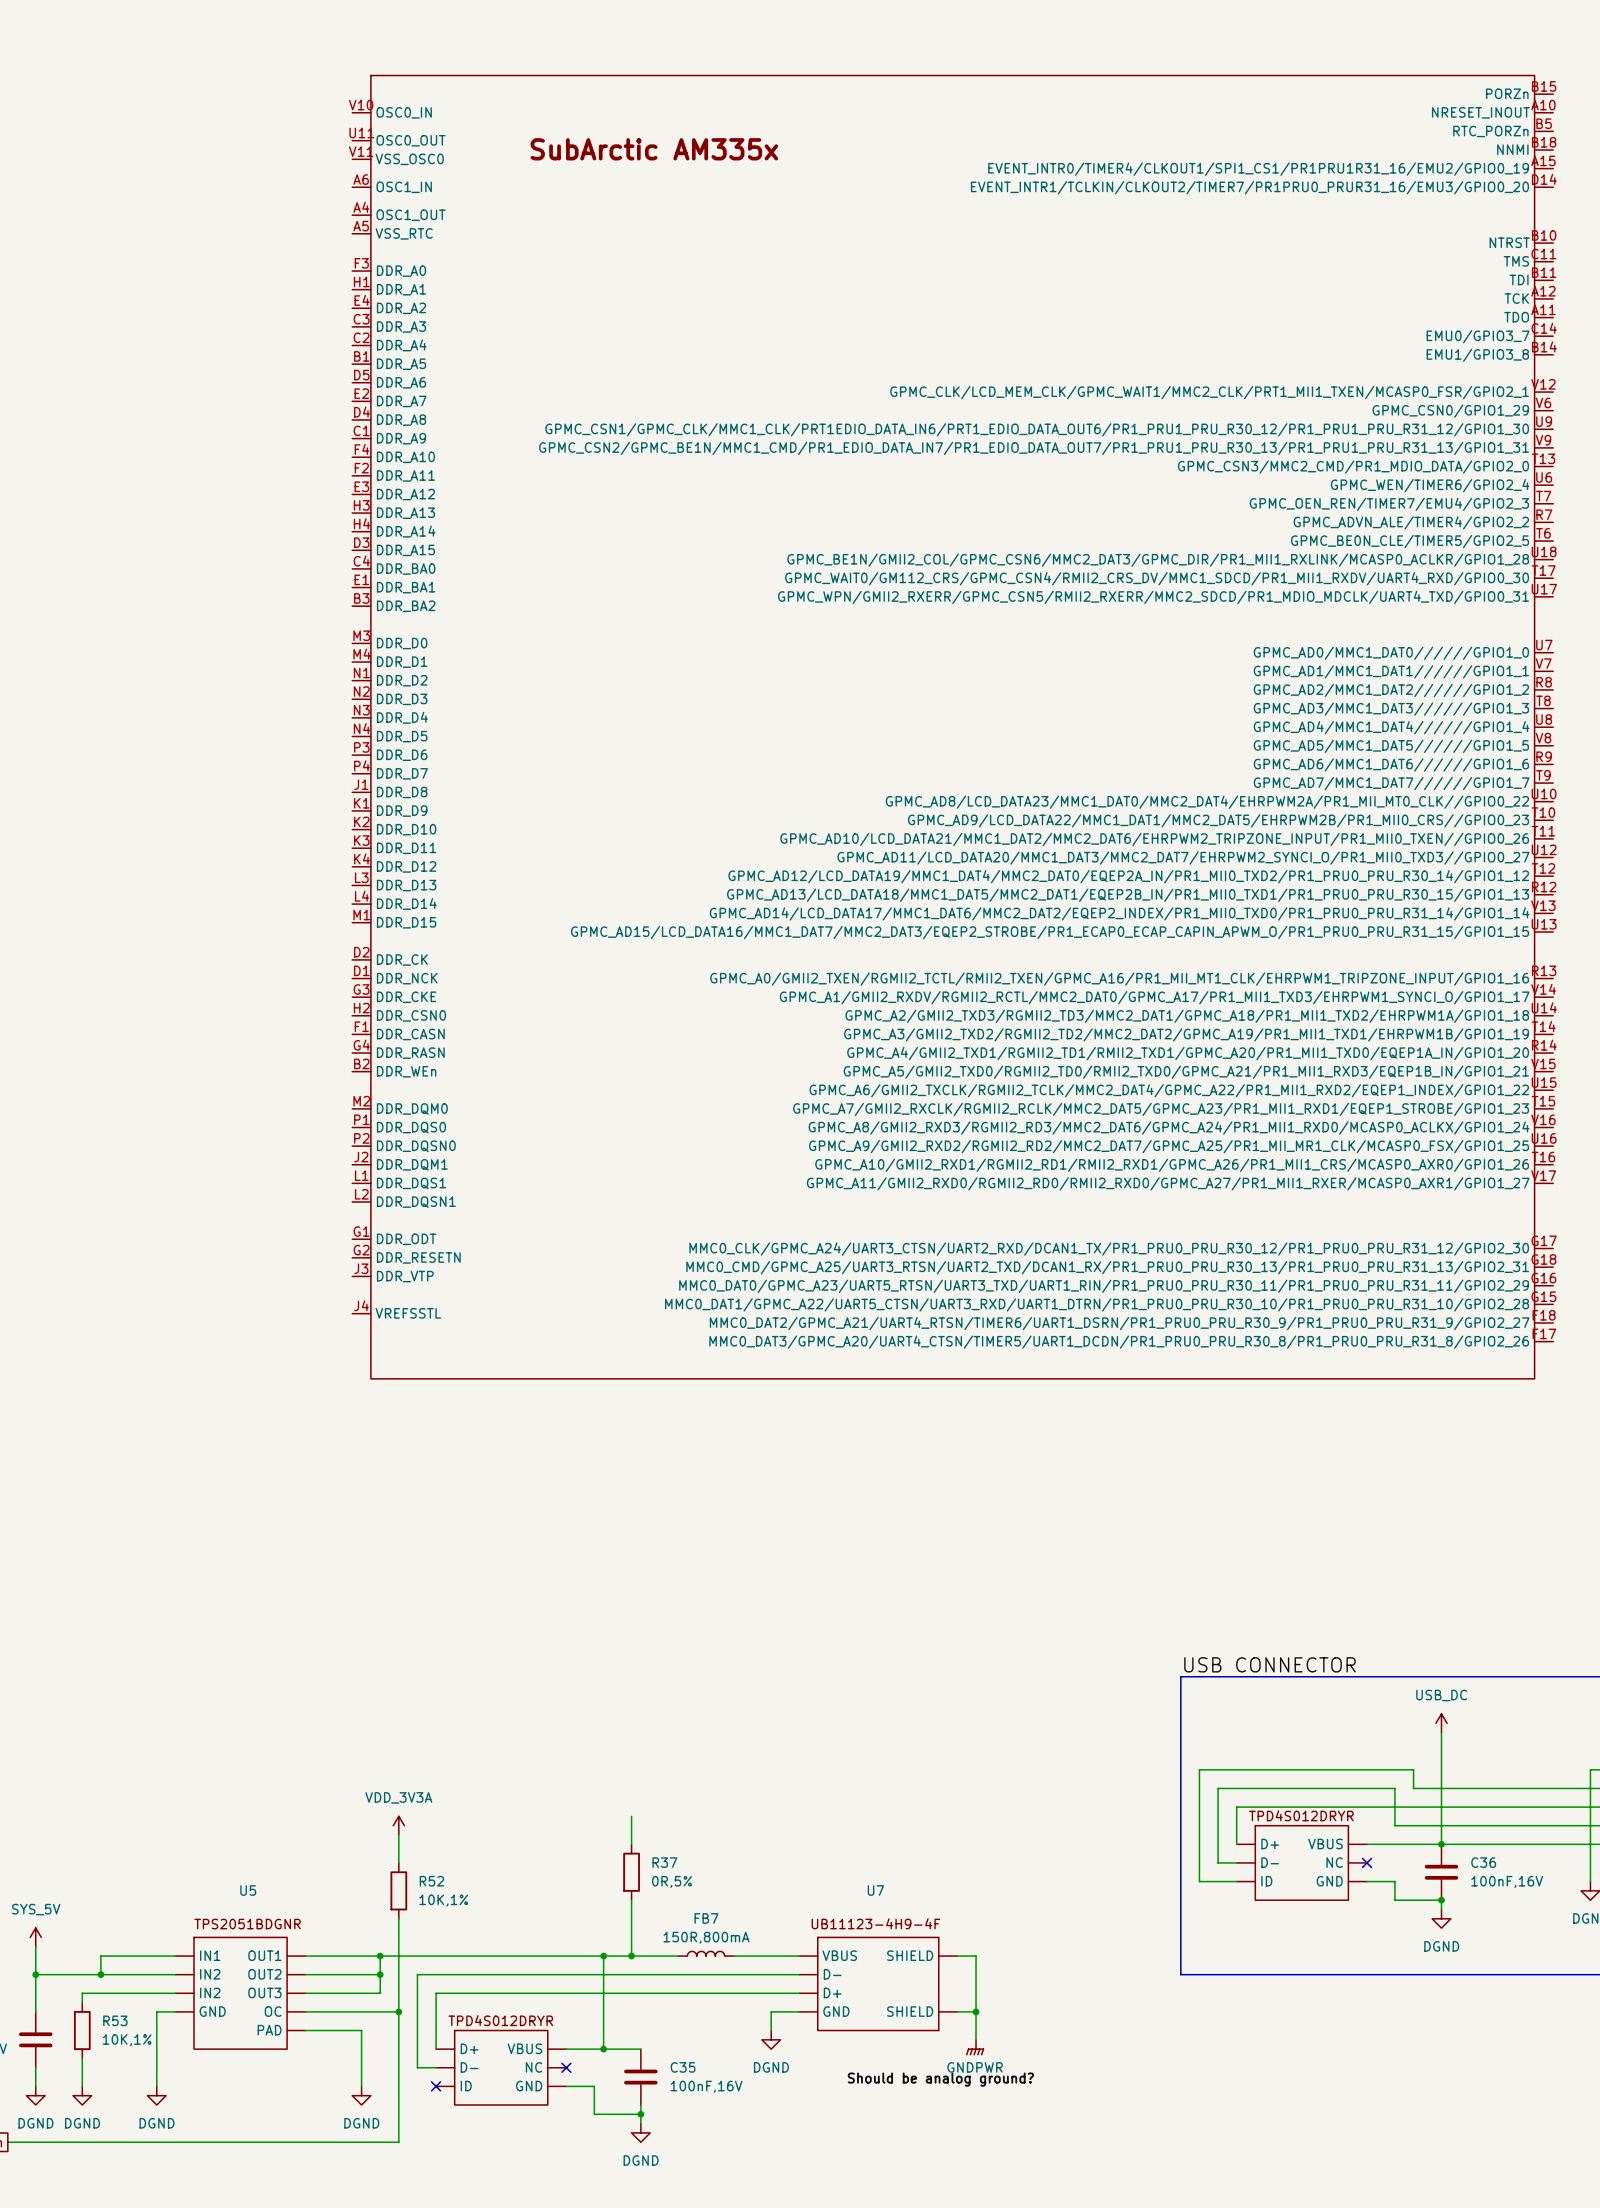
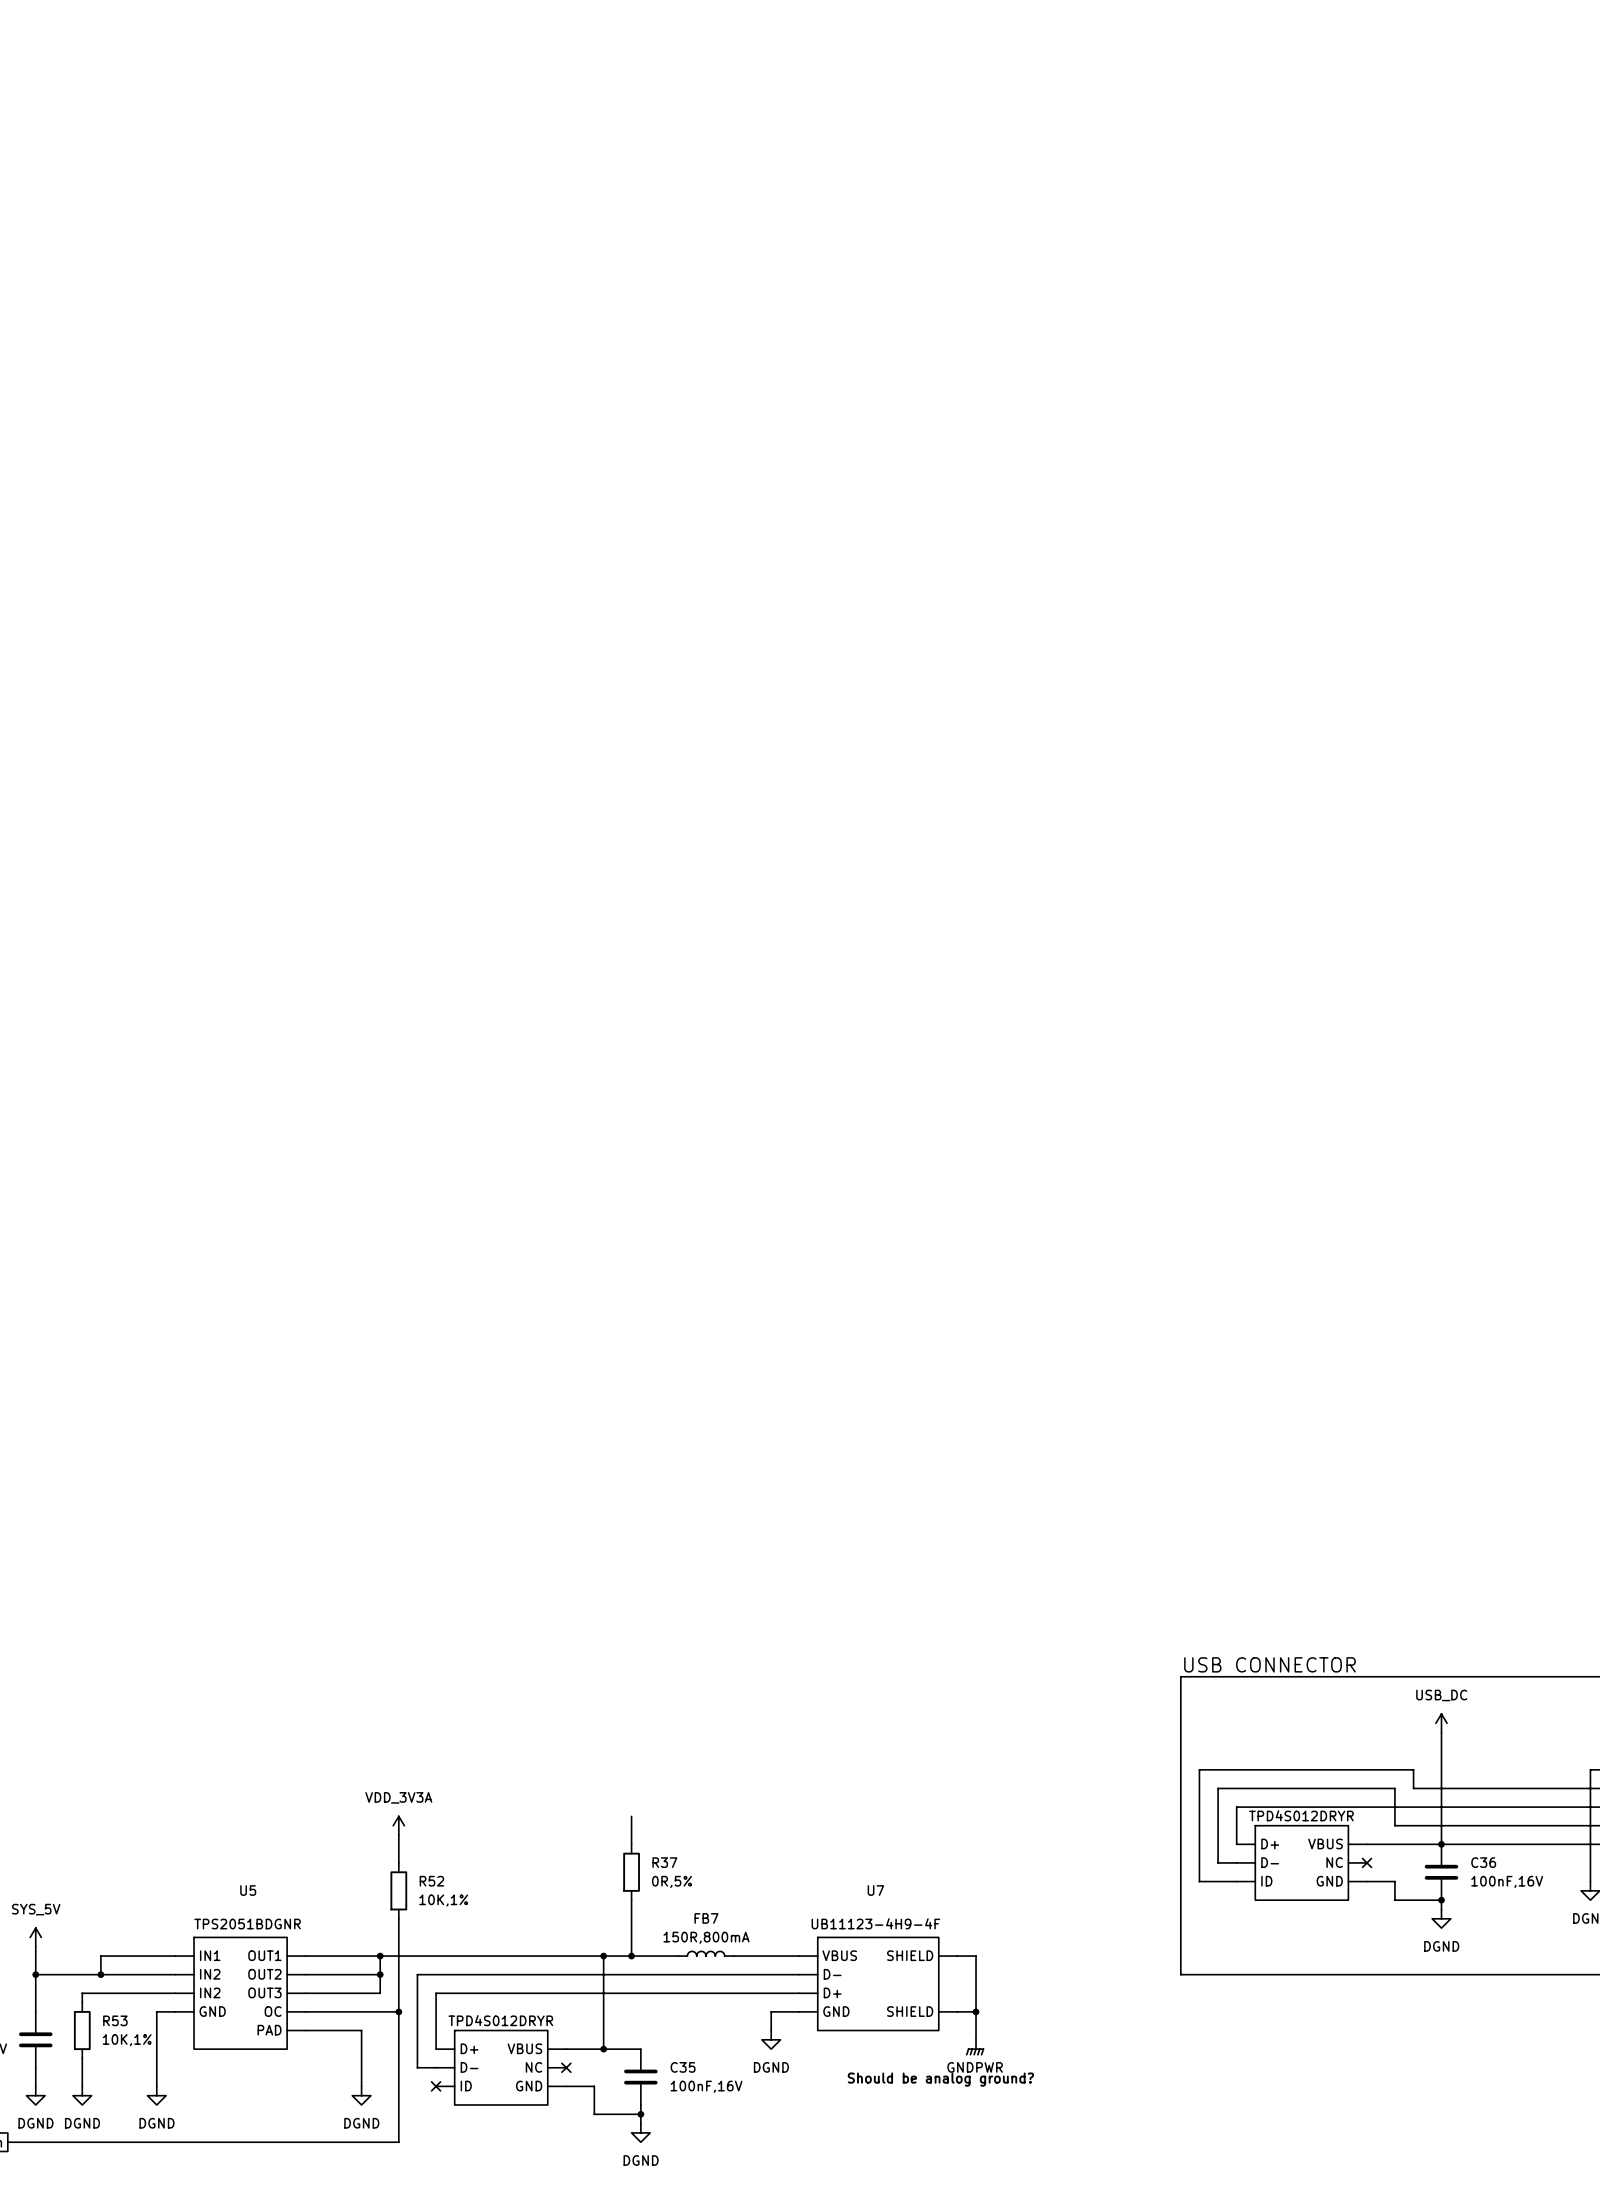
part: (952, 727) -> none

